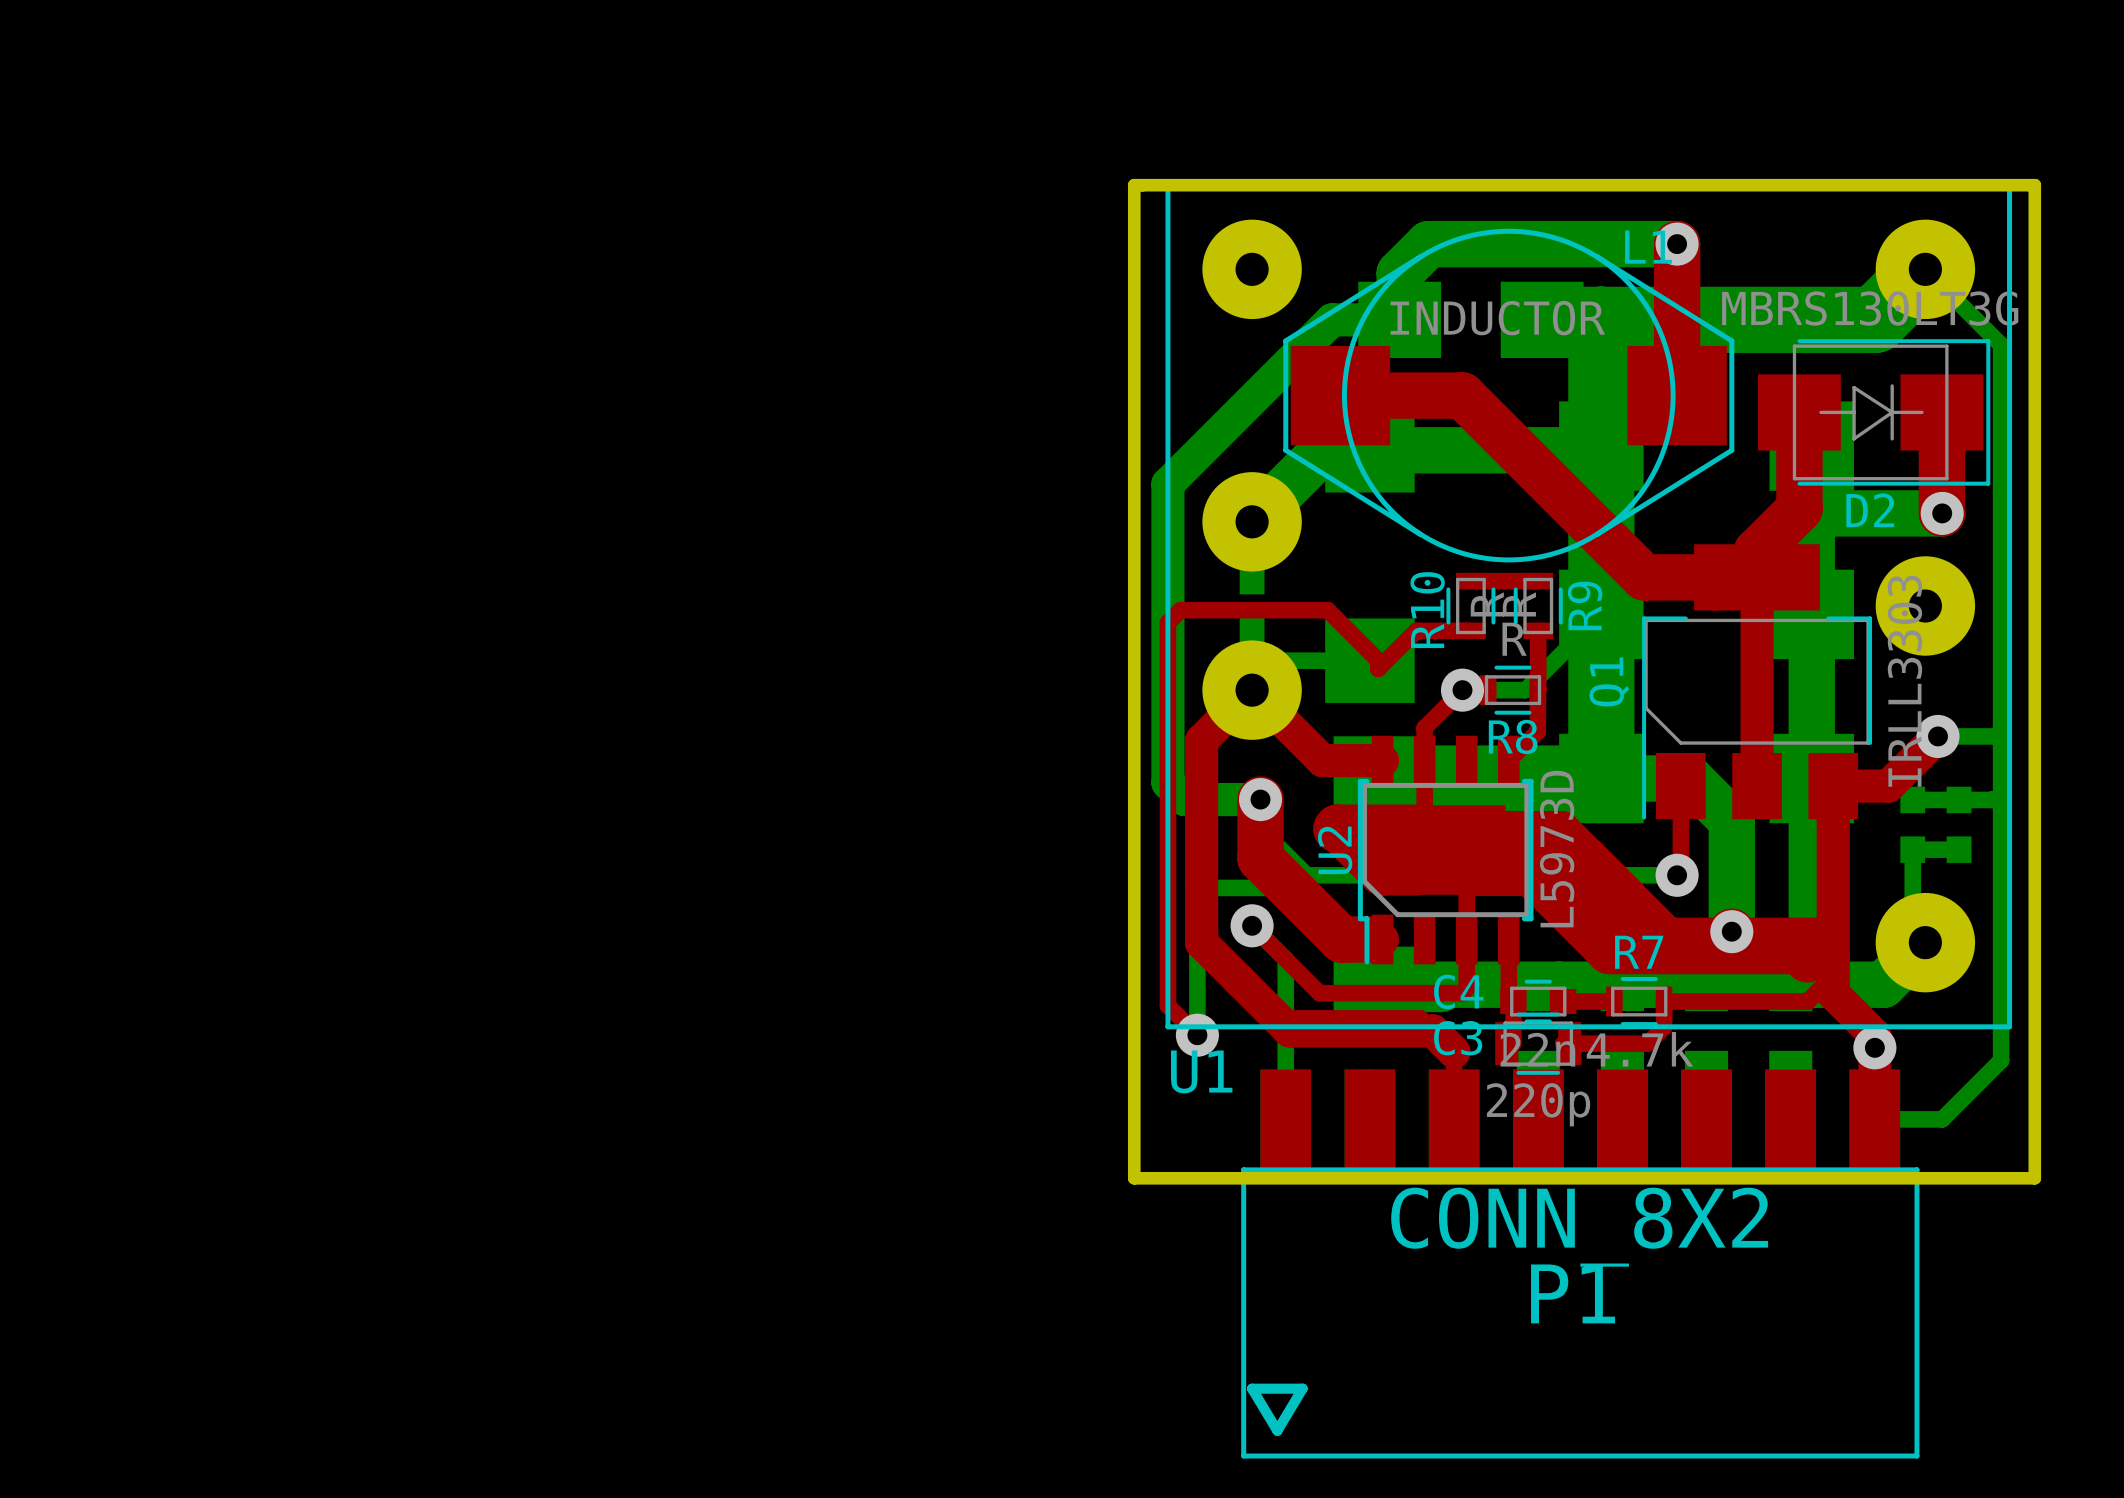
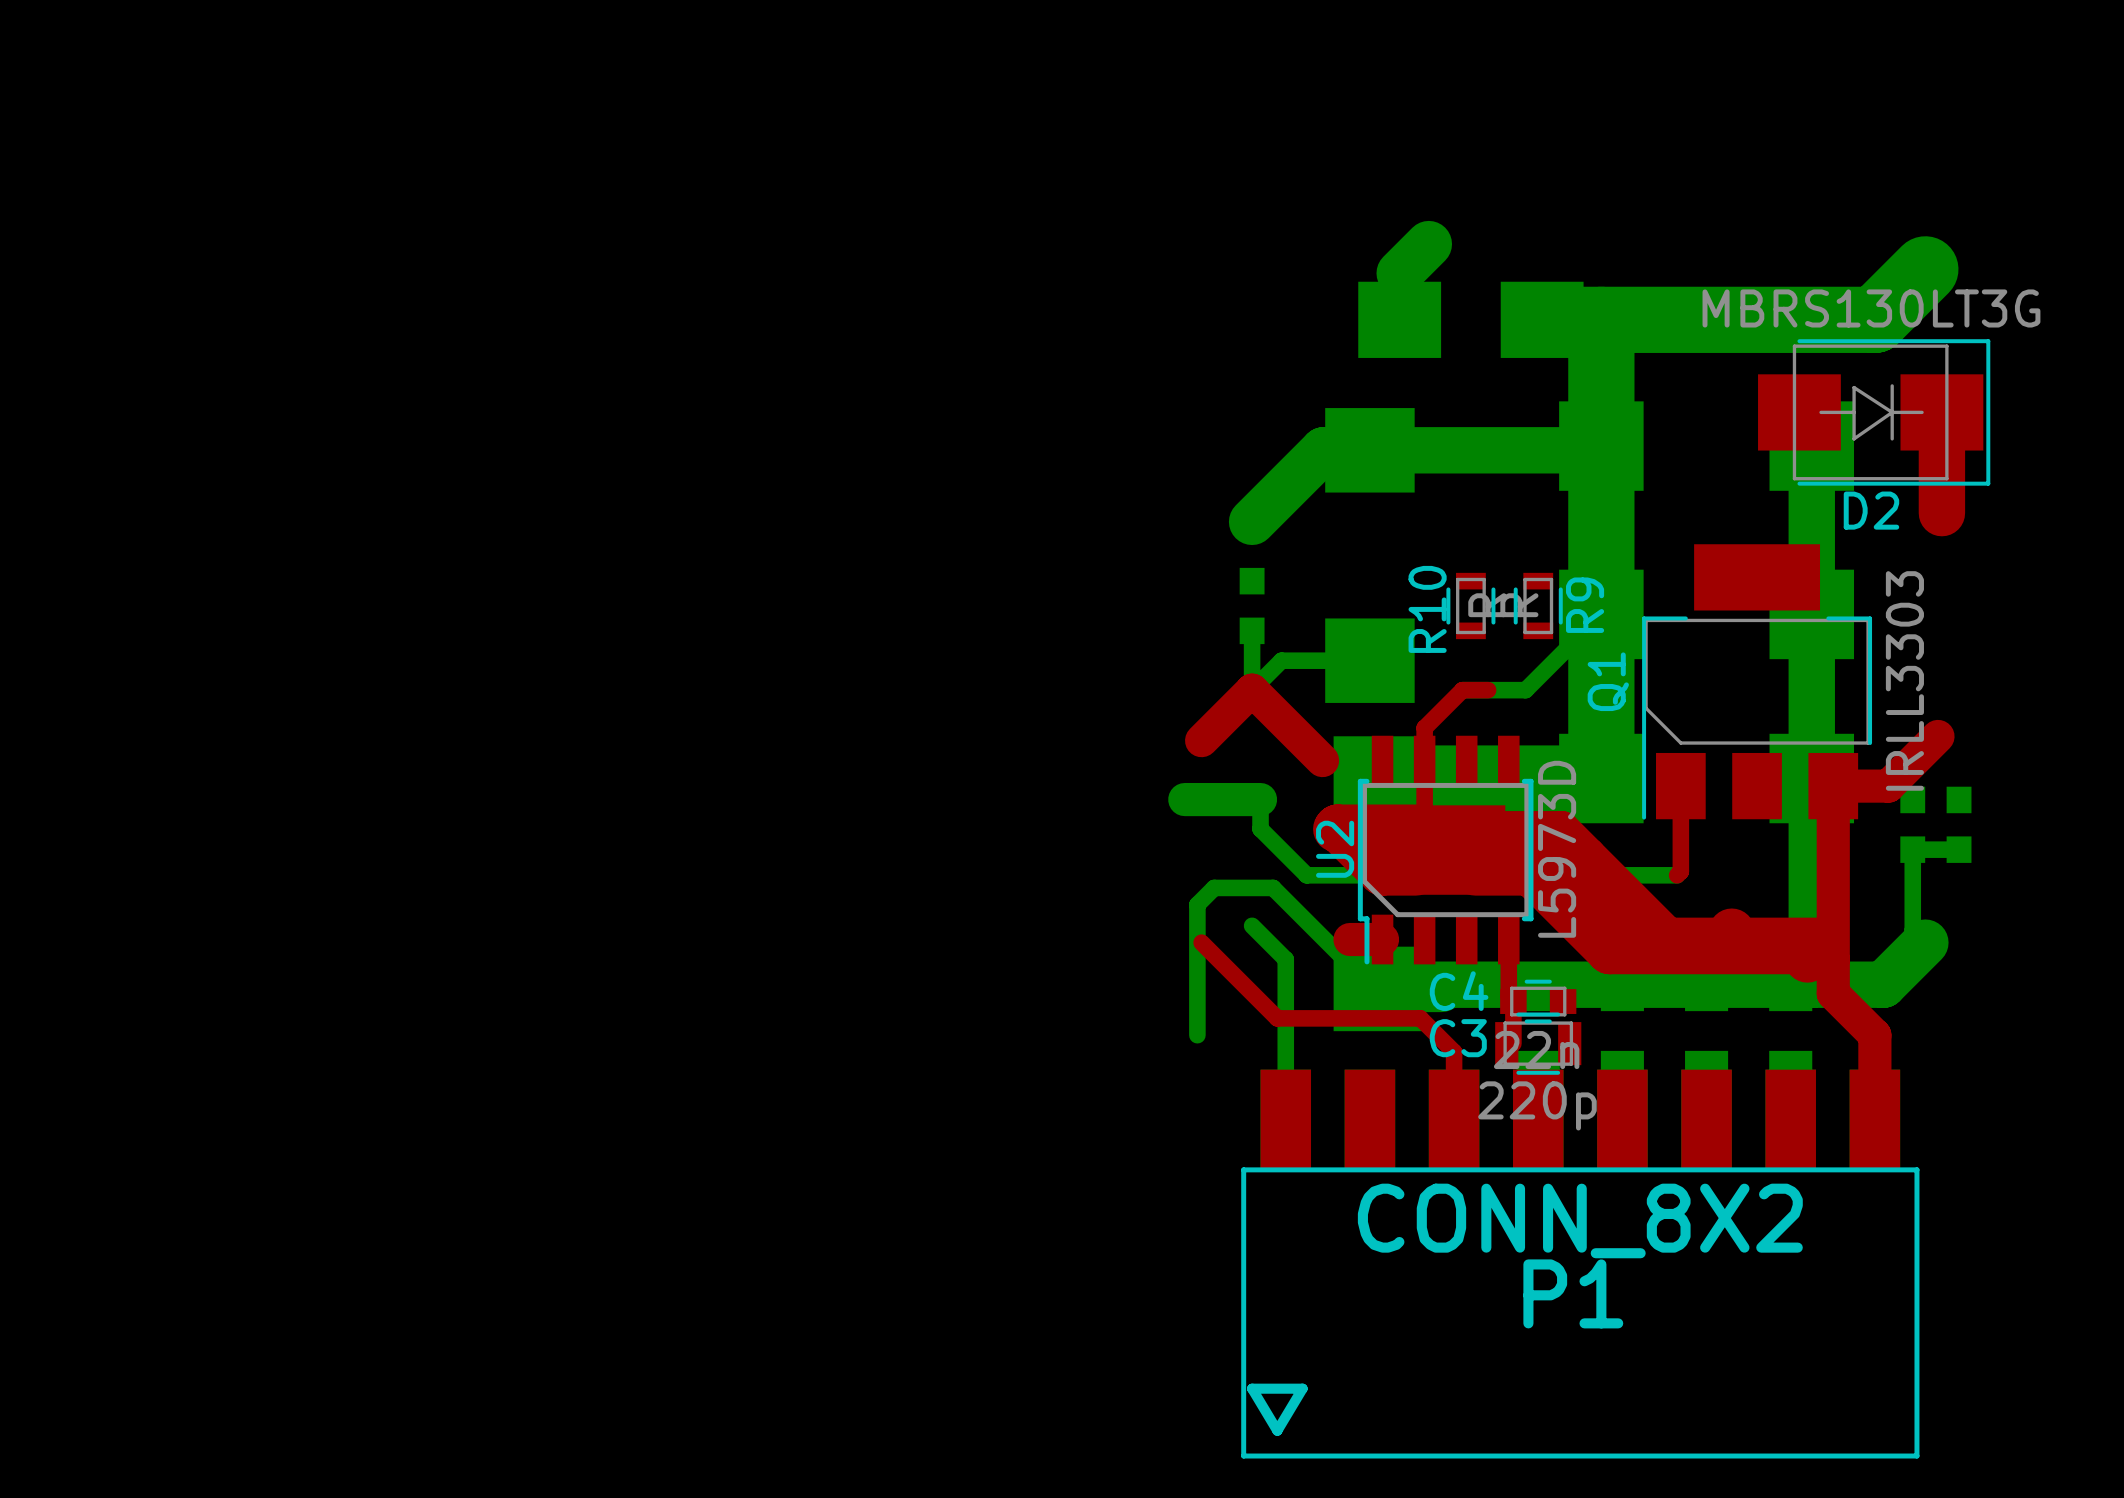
board edge: (1134, 185) (1134, 1178) (2034, 1178) (2034, 185) (1134, 185) -> none
bottom track: (1677, 244) (1428, 244) (1399, 273) -> none
top track: (1677, 244) (1677, 395) -> none
via: (1677, 244) -> none
bottom track: (1399, 319) (1332, 319) (1167, 483) (1167, 782) -> none
bottom track: (1874, 319) (1925, 269) (2001, 345) (2001, 1060) (1942, 1119) (1874, 1119) (1874, 1047) -> none
top track: (1340, 395) (1462, 395) (1644, 577) (1757, 577) (1757, 551) (1799, 508) (1799, 412) -> none
L1: INDUCTOR (1508, 395) -> none
bottom track: (1824, 513) (1811, 513) (1942, 513) -> none
via: (1942, 513) -> none
top track: (1757, 568) (1757, 786) -> none
top track: (1470, 581) (1538, 581) -> none
U1: (1588, 605) -> none
top track: (1470, 630) (1416, 630) (1378, 668) (1378, 660) (1327, 610) (1180, 610) (1167, 622) (1167, 1005) (1197, 1035) -> none
top track: (1538, 630) (1538, 689) -> none
via: (1462, 690) -> none
R8: R (1513, 690) -> none
top track: (1537, 690) (1537, 731) (1508, 760) -> none
bottom track: (1938, 736) (2001, 736) -> none
via: (1938, 736) -> none
top track: (1322, 760) (1382, 760) (1322, 760) -> none
bottom track: (1601, 778) (1689, 778) (1731, 820) (1731, 931) -> none
top track: (1833, 786) (1833, 975) (1807, 1001) (1664, 1001) (1664, 1027) (1647, 1043) (1563, 1043) -> none
top track: (1260, 799) (1260, 858) (1341, 939) (1369, 939) -> none
via: (1260, 799) -> none
bottom track: (1912, 799) (1992, 799) -> none
top track: (1415, 827) (1475, 827) (1475, 872) (1466, 881) (1466, 988) (1462, 993) (1319, 993) (1252, 925) -> none
via: (1677, 875) -> none
top track: (1201, 883) (1201, 740) (1201, 942) (1289, 1031) (1433, 1031) (1454, 1052) -> none
via: (1252, 925) -> none
via: (1731, 931) -> none
top track: (1563, 1001) (1614, 1001) -> none
R7: 4.7k (1639, 1001) -> none
via: (1197, 1035) -> none
via: (1874, 1047) -> none

